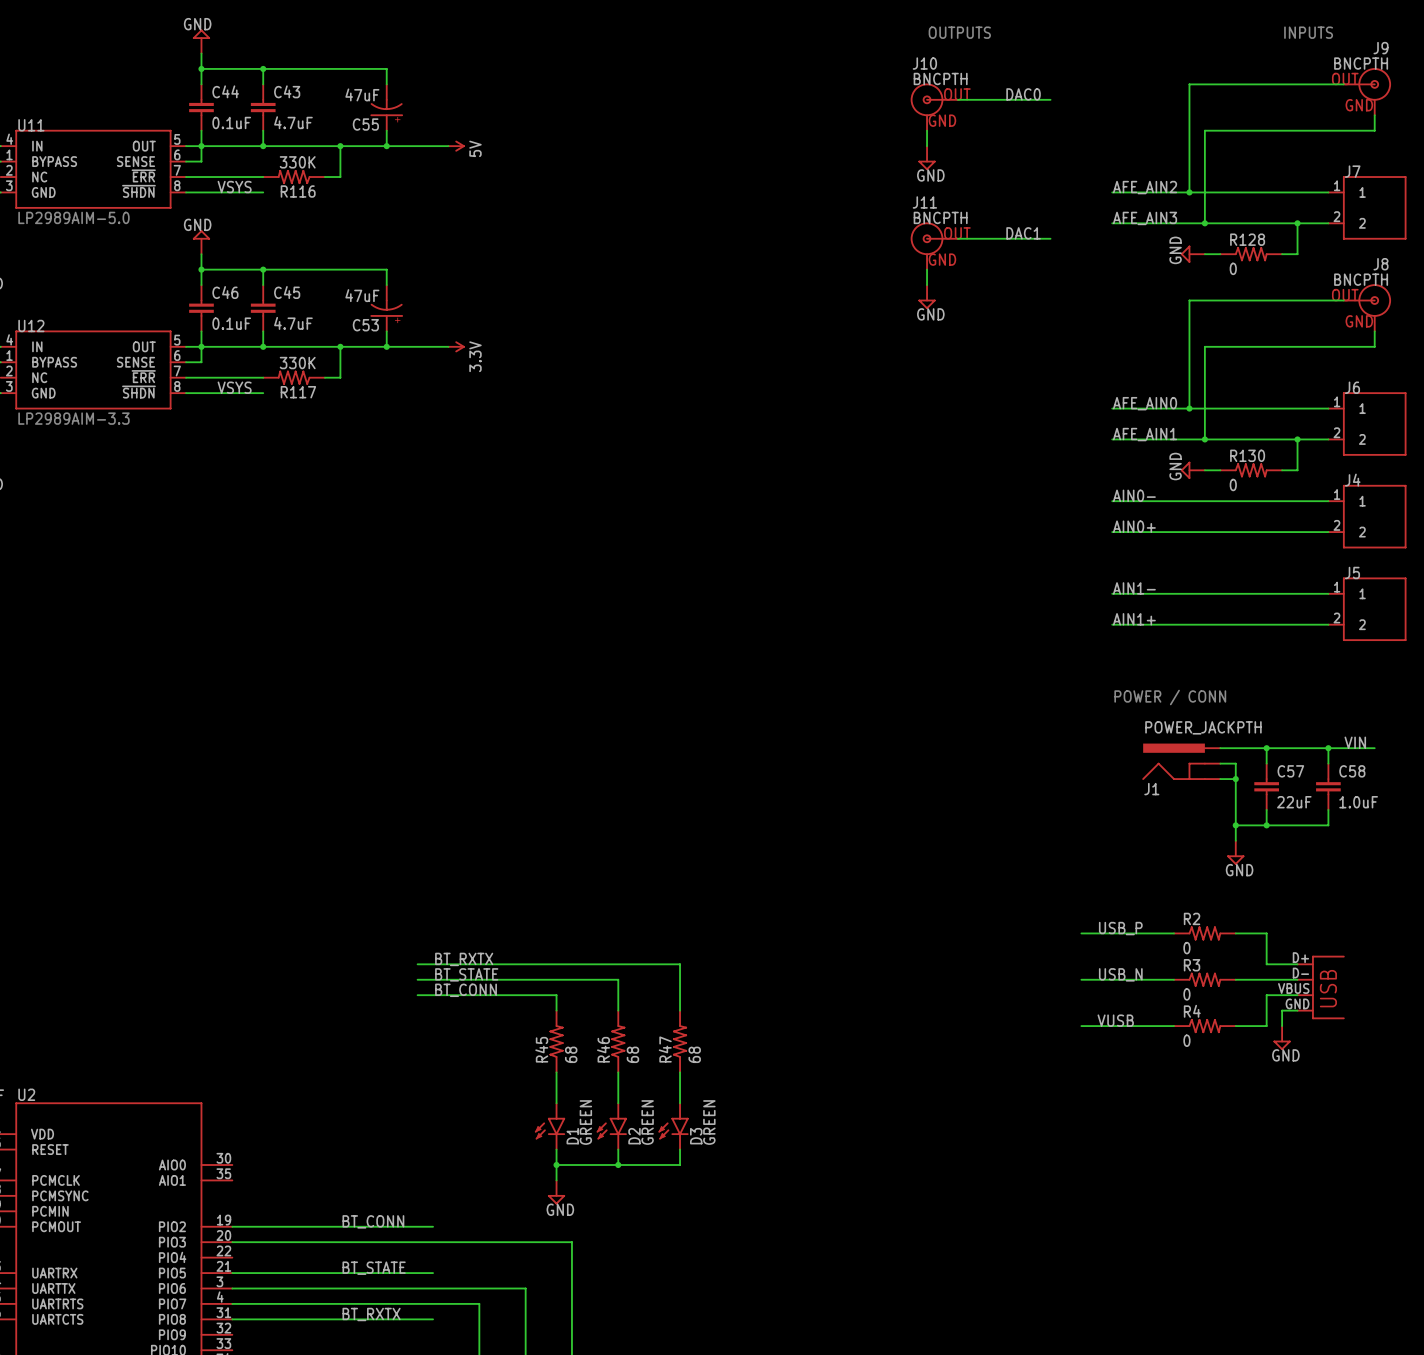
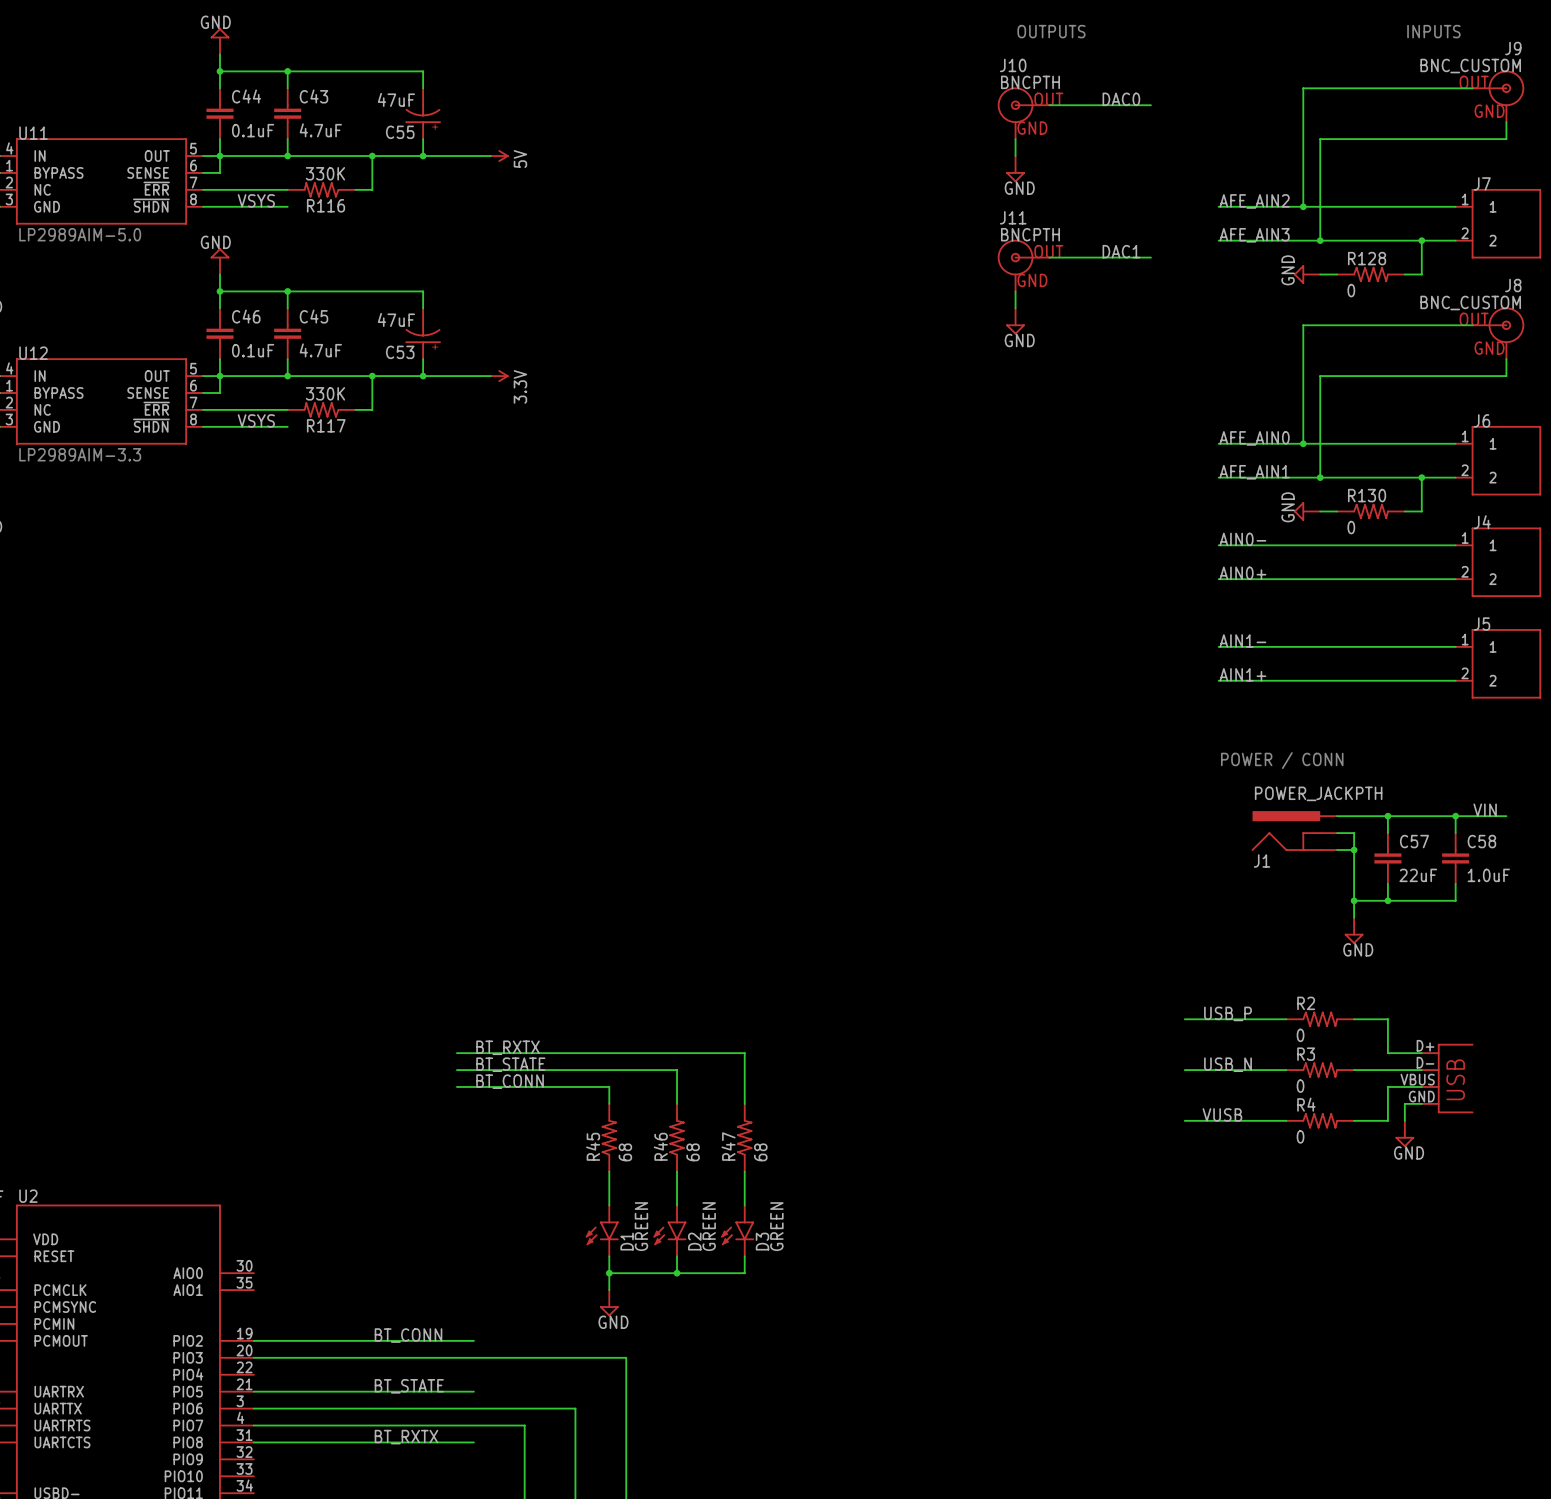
J9 value: BNCPTH (1361, 63) -> BNC_CUSTOM (1470, 66)
J8 value: BNCPTH (1361, 279) -> BNC_CUSTOM (1470, 303)

